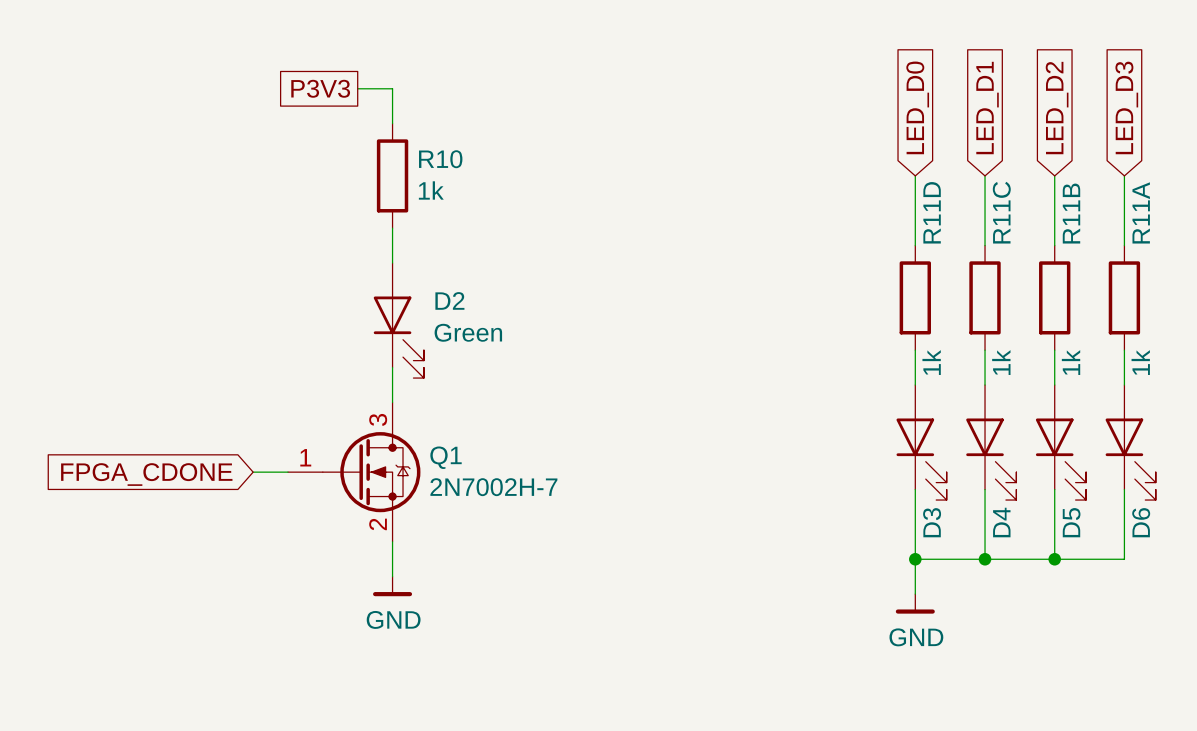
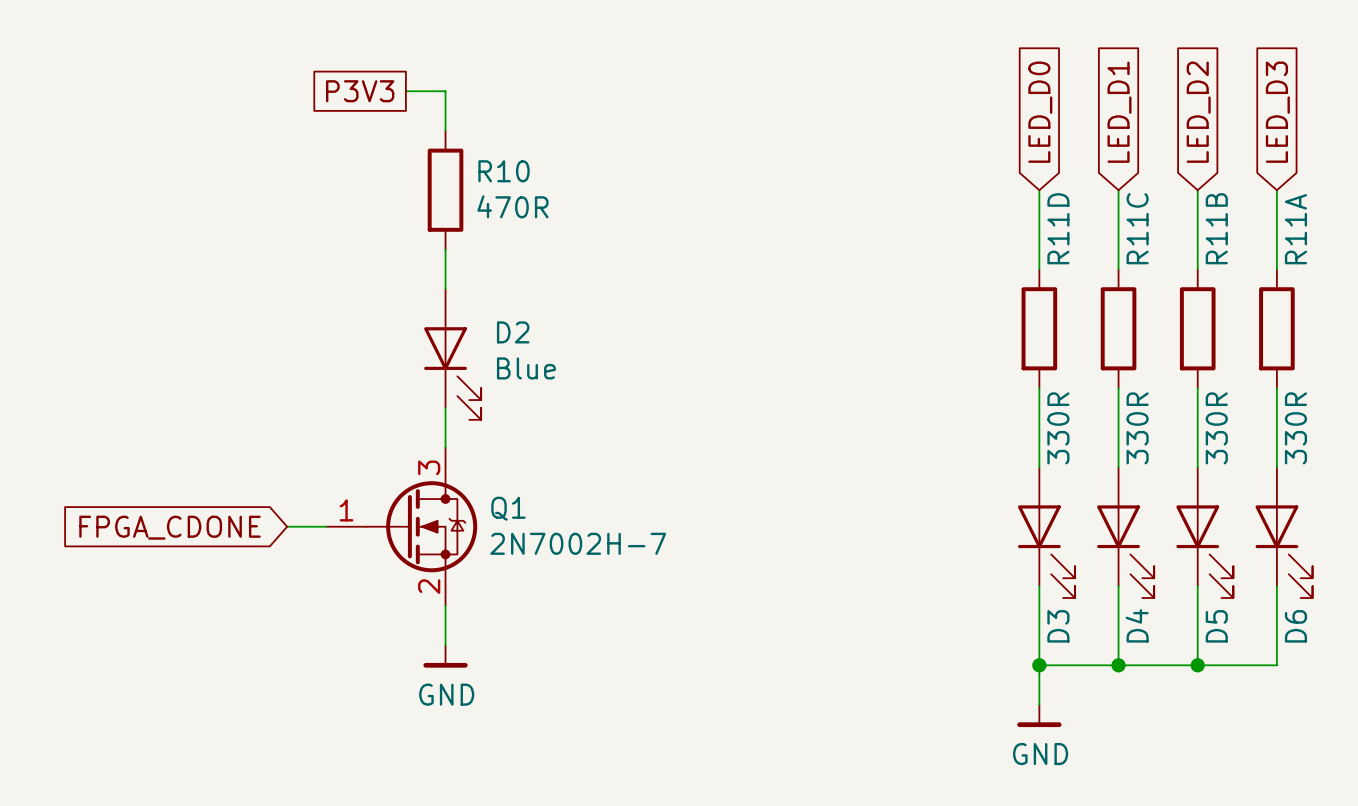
R10 value: 1k (431, 190) -> 470R (512, 206)
D2 value: Green (468, 332) -> Blue (526, 368)
R11D value: 1k (931, 362) -> 330R (1058, 428)
R11C value: 1k (1001, 362) -> 330R (1137, 428)
R11B value: 1k (1071, 362) -> 330R (1216, 428)
R11A value: 1k (1140, 362) -> 330R (1295, 428)
D3 position: (921, 442) -> (1046, 532)
D4 position: (991, 442) -> (1125, 532)
D5 position: (1060, 442) -> (1204, 532)
D6 position: (1130, 442) -> (1284, 532)
wire: (915, 559) (1124, 559) -> (1039, 704) (1039, 665) (1276, 665) (1276, 625)
junction position: (915, 559) -> (1039, 665)
wire: none -> (1118, 625) (1118, 665)
junction position: (985, 559) -> (1118, 665)
wire: none -> (1197, 625) (1197, 665)
junction position: (1054, 559) -> (1197, 665)
power symbol position: GND (915, 603) -> GND (1039, 715)

